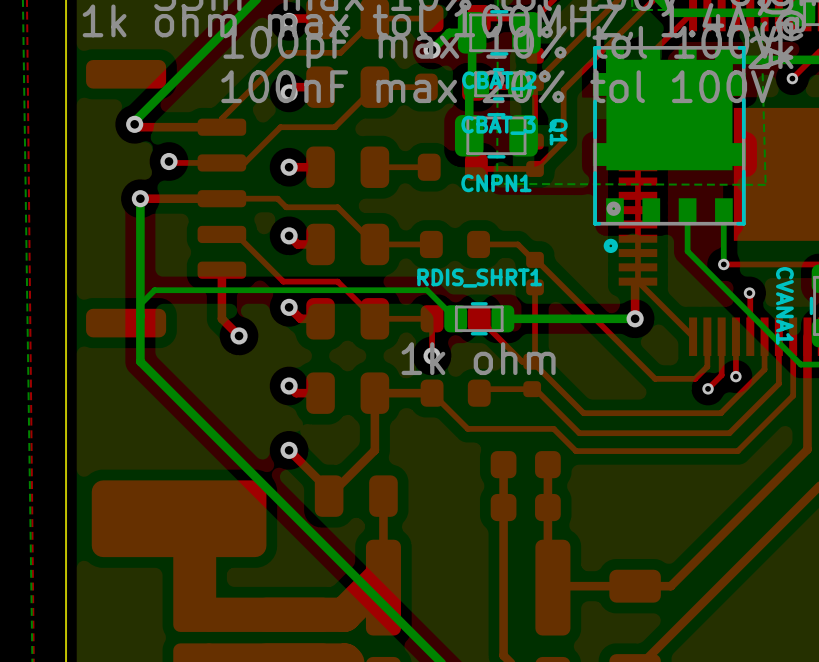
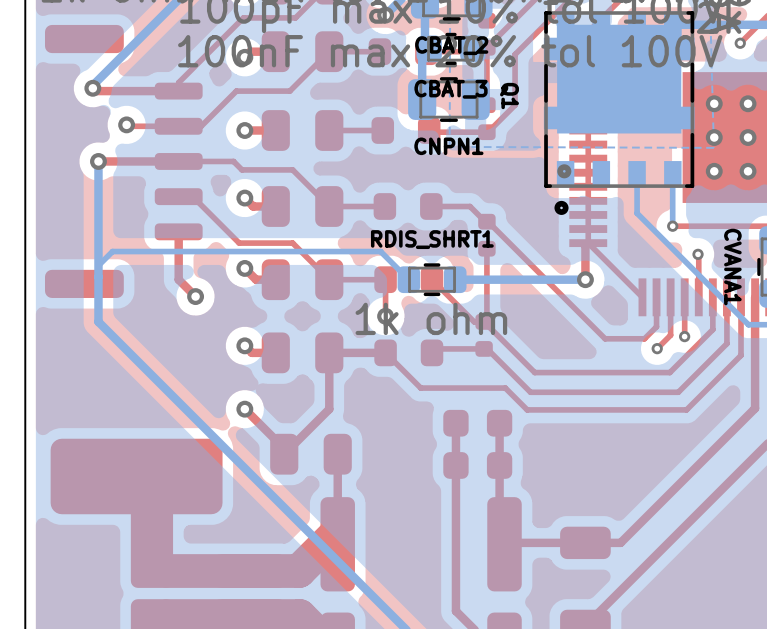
via: none -> (714, 103)
via: none -> (748, 103)
via: none -> (714, 137)
via: none -> (748, 137)
via: none -> (714, 171)
via: none -> (748, 171)

